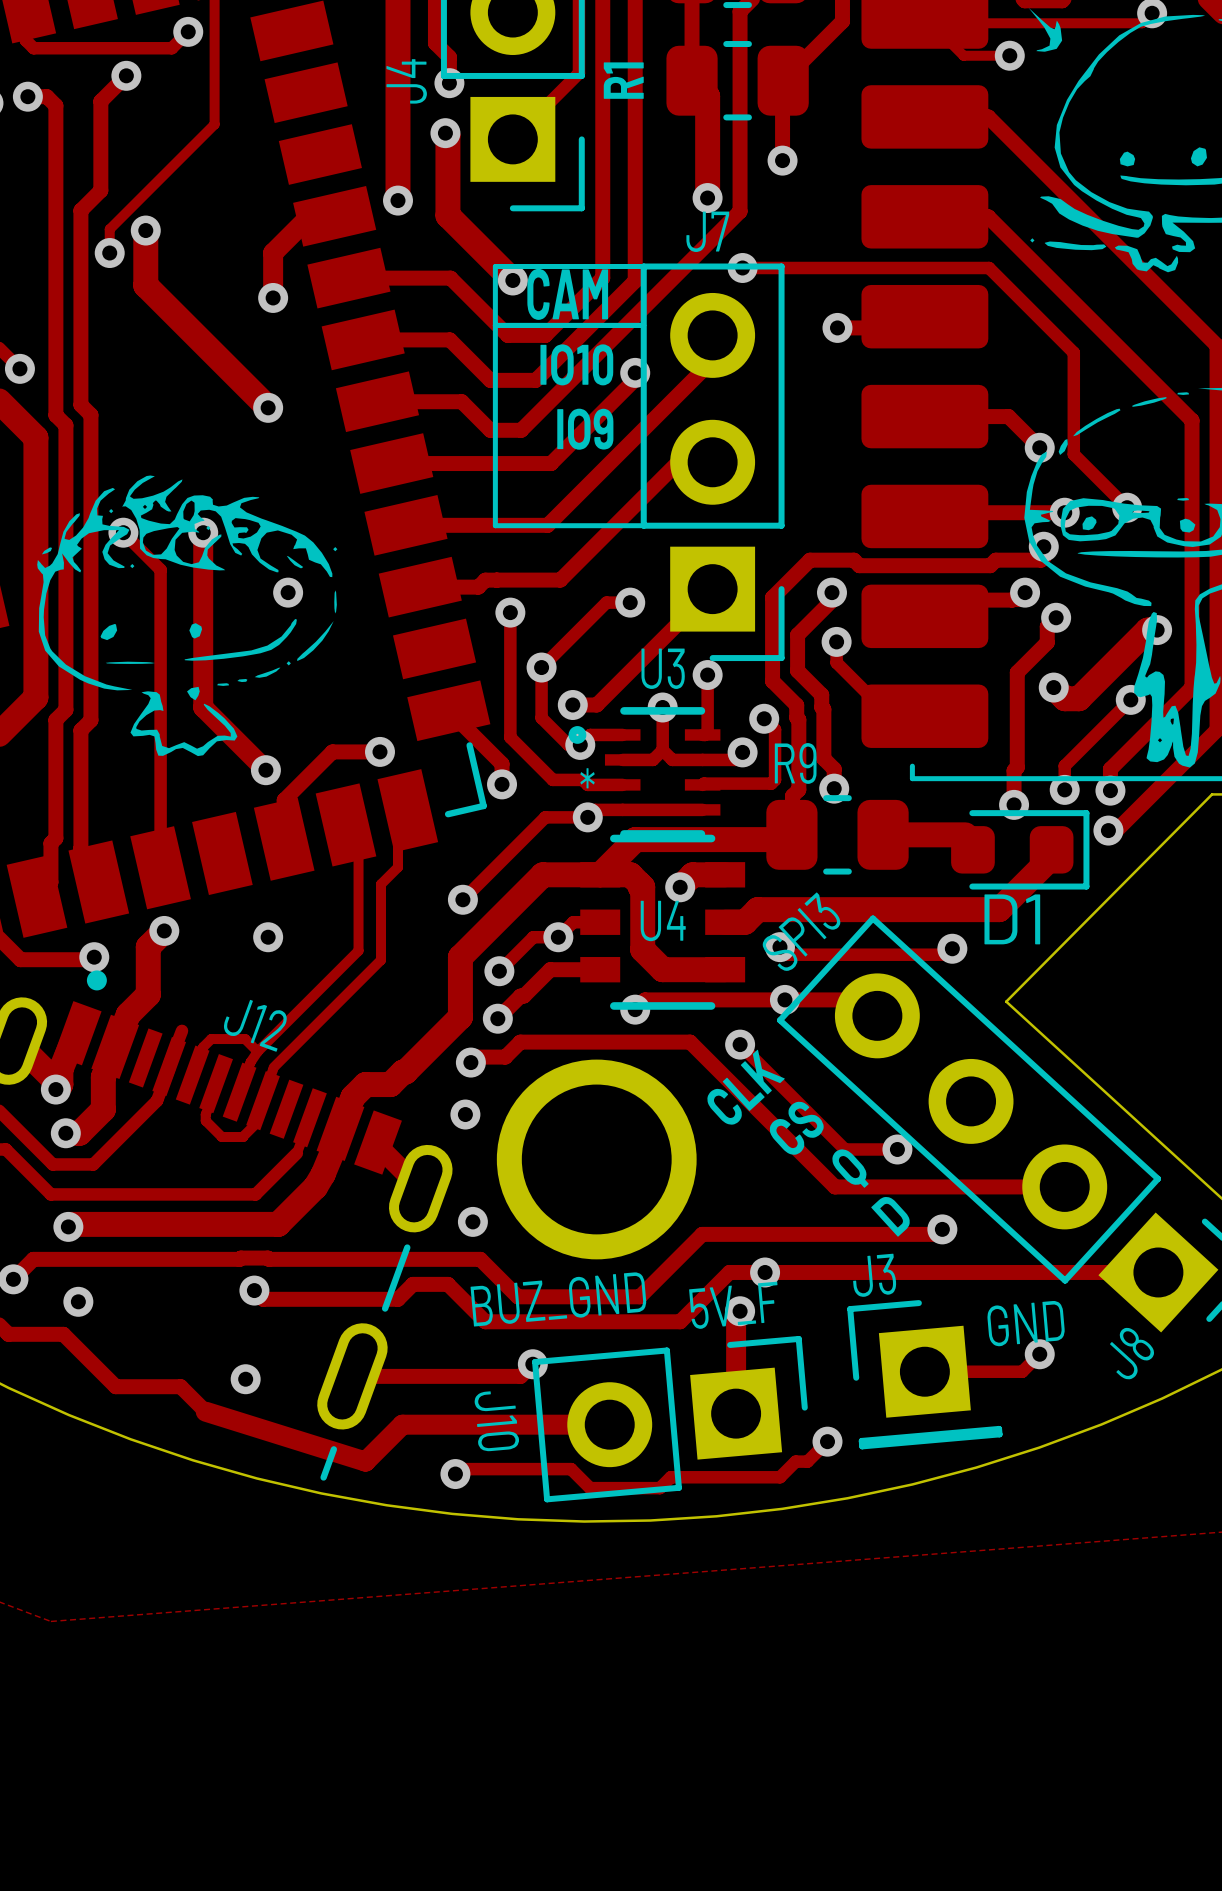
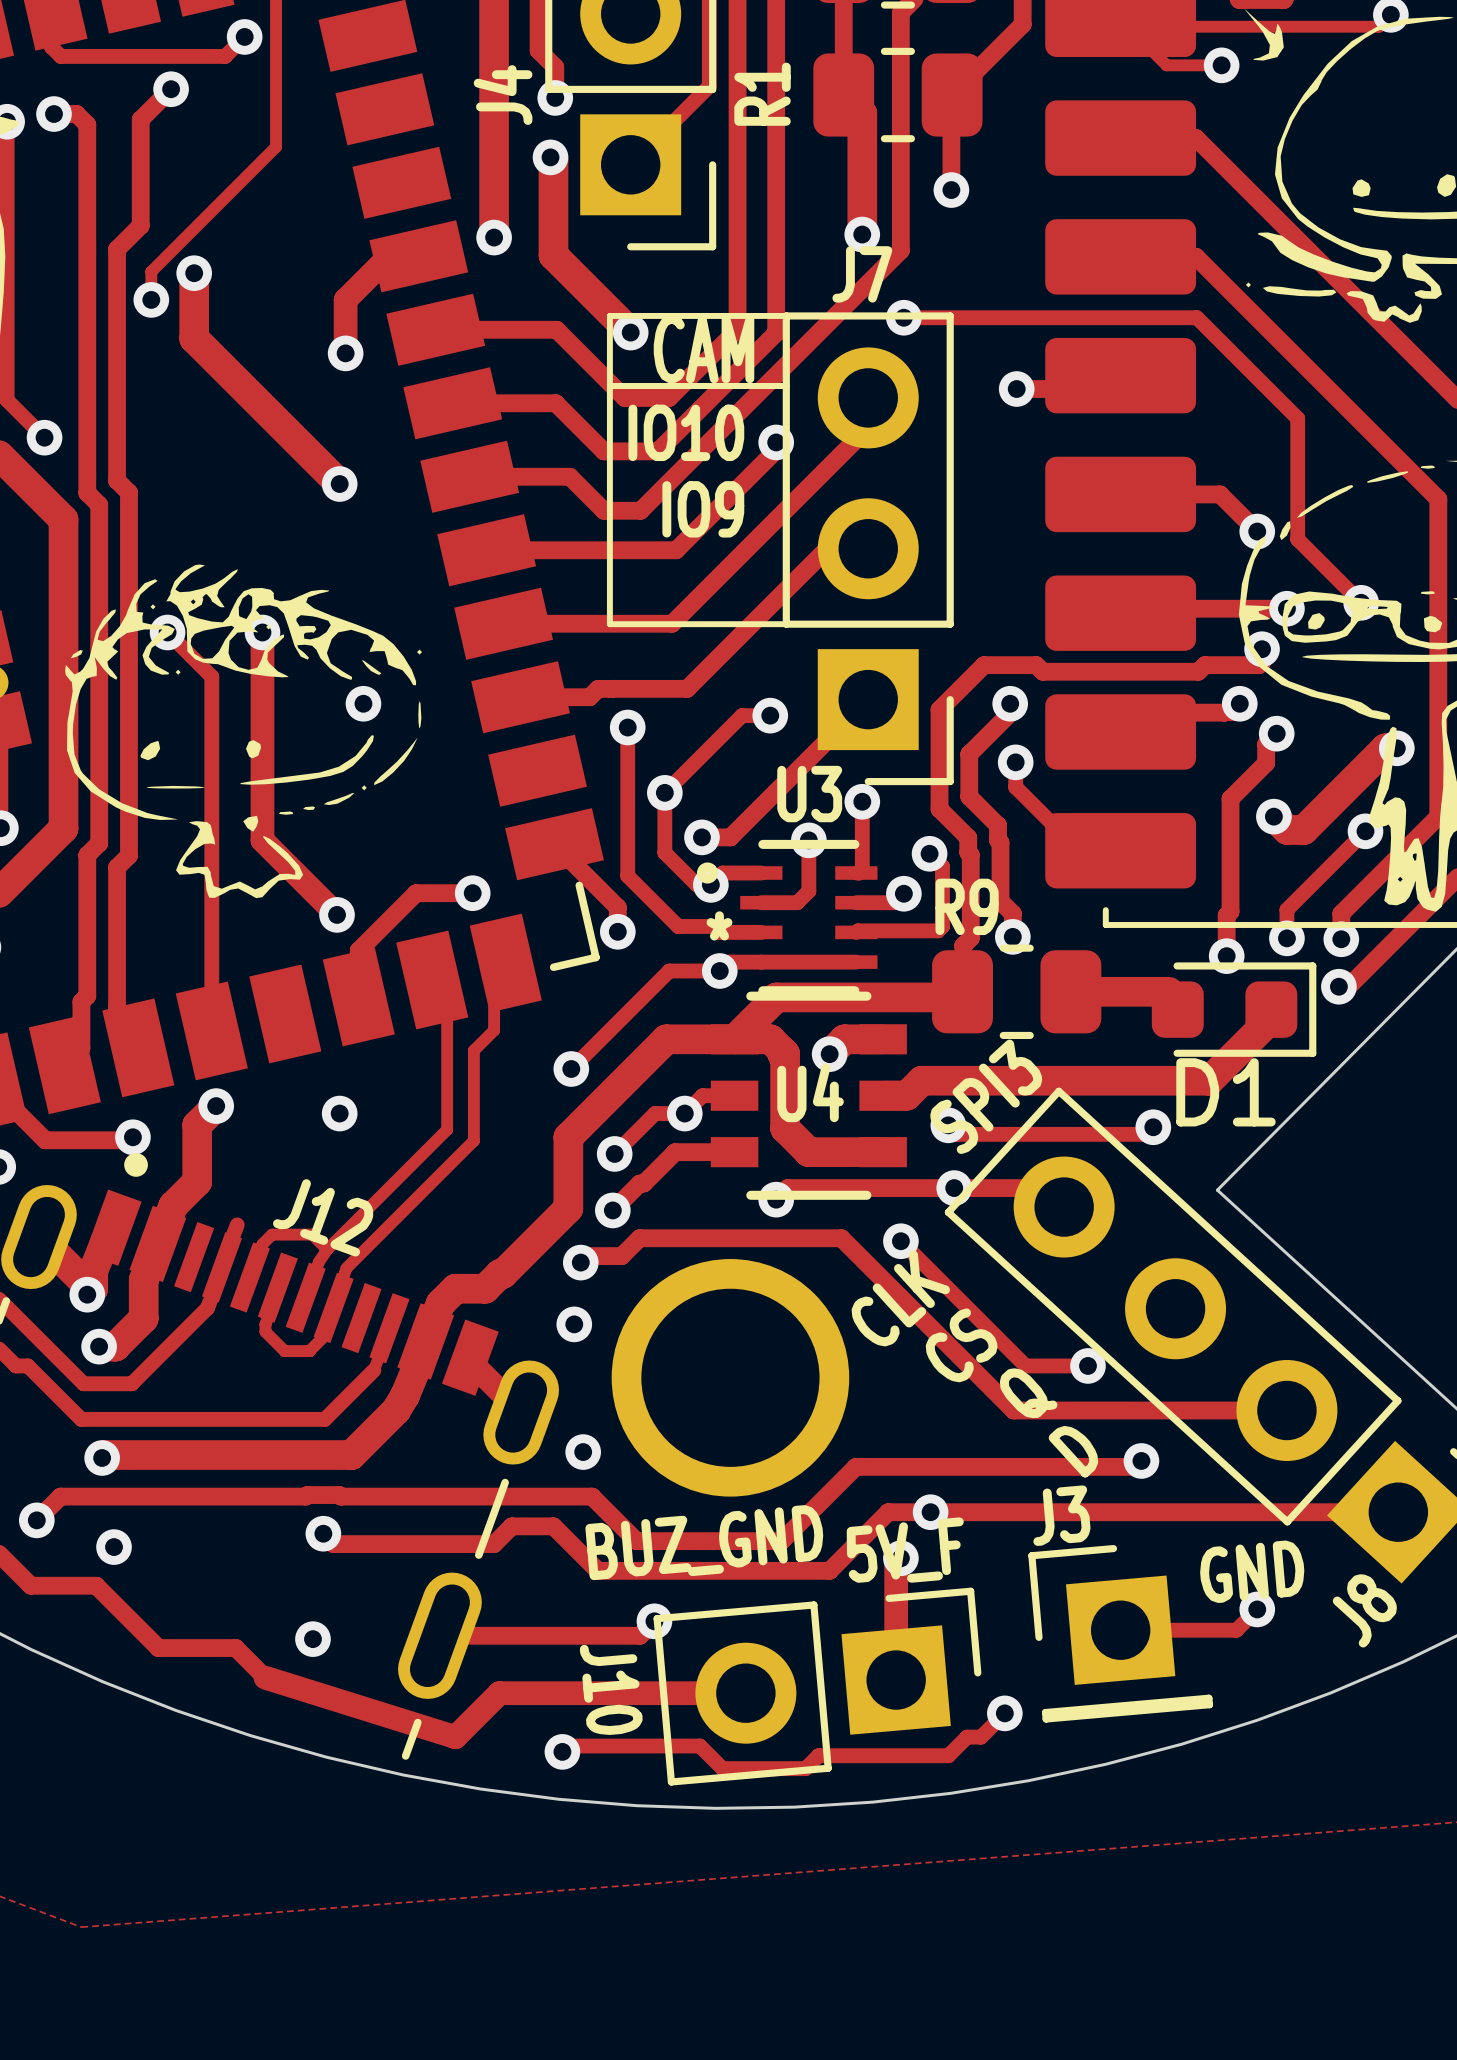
track: (662, 750) (672, 759) (702, 759) -> none

